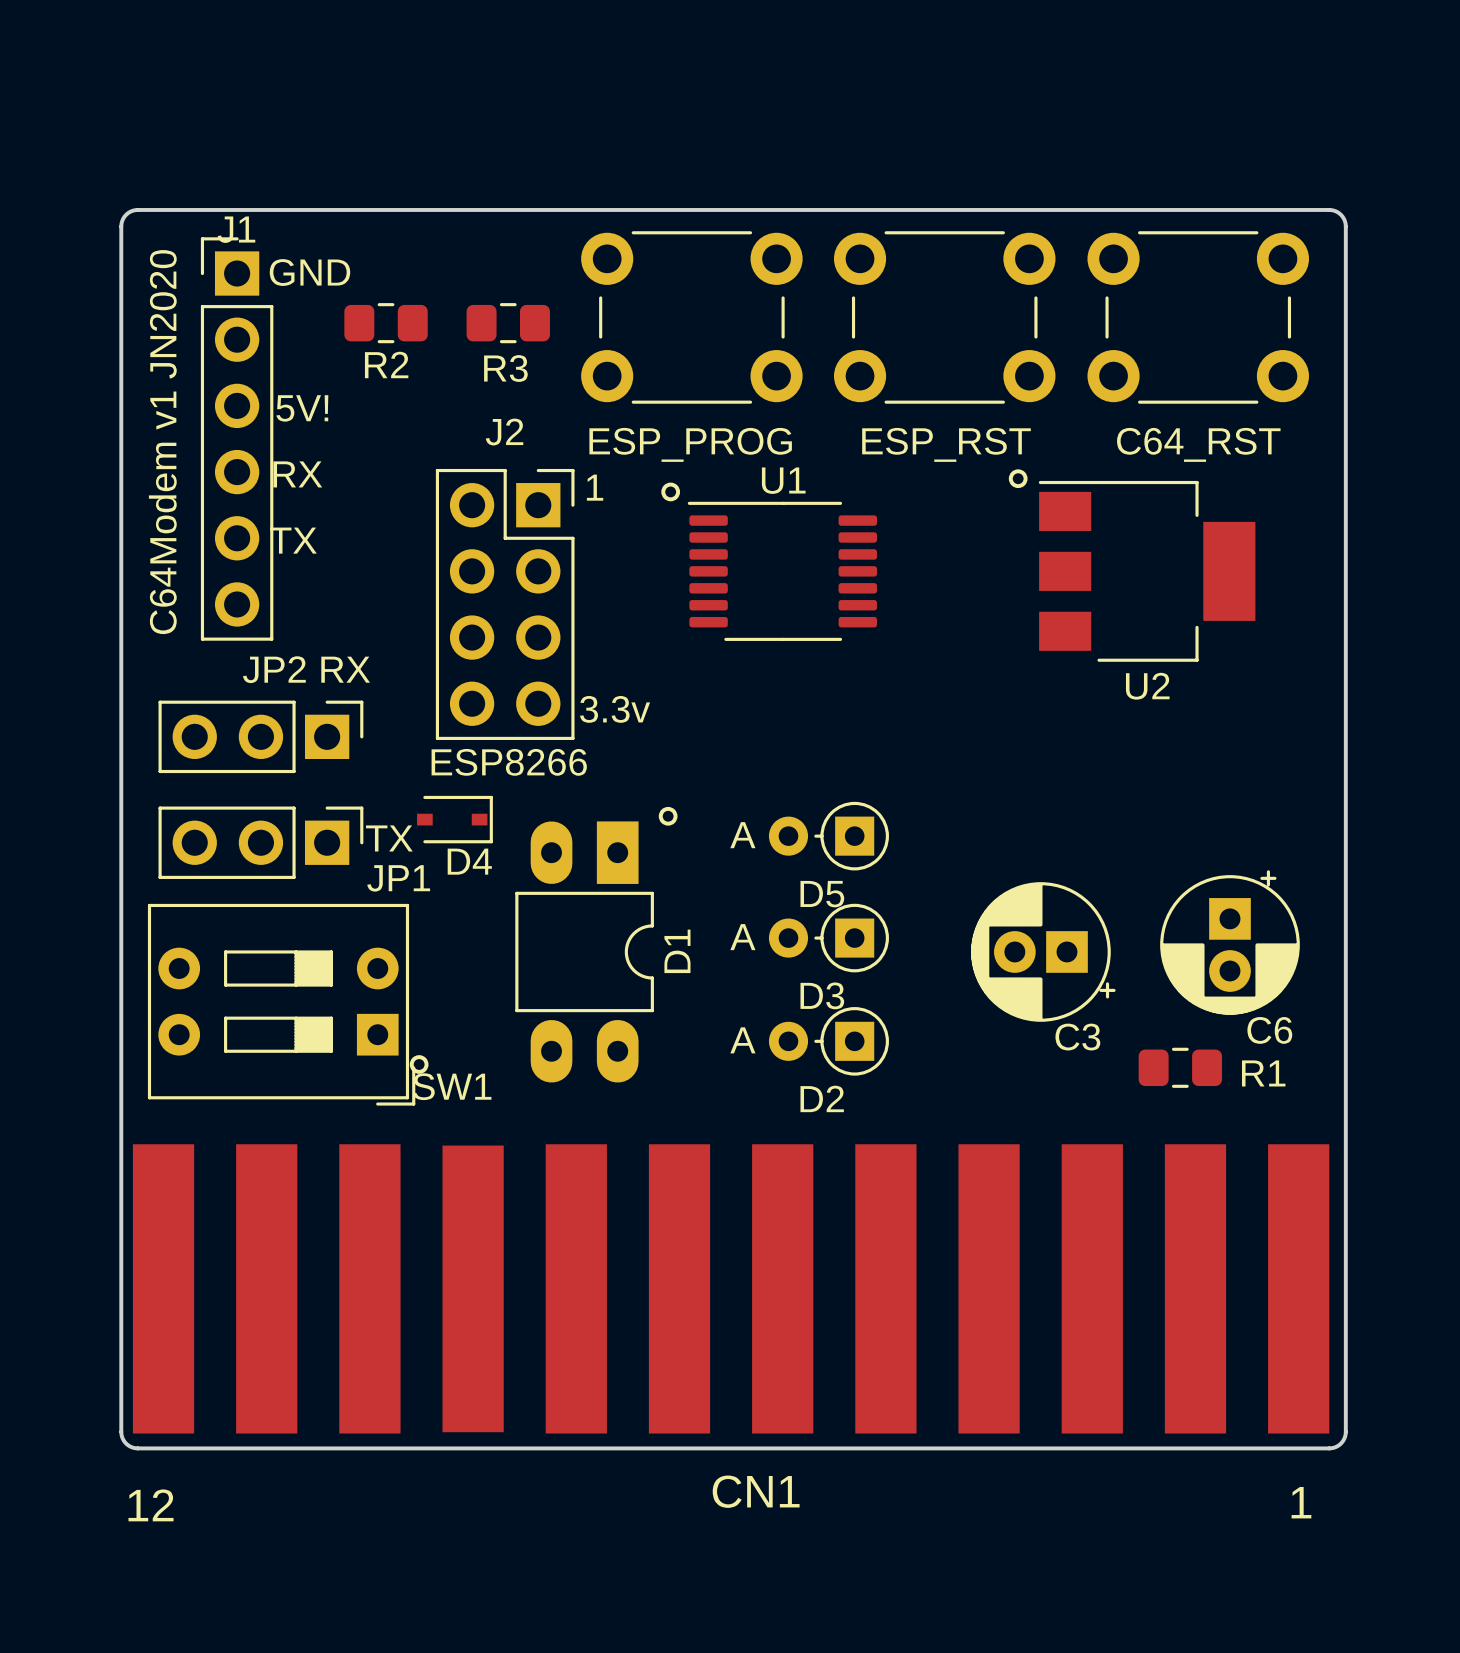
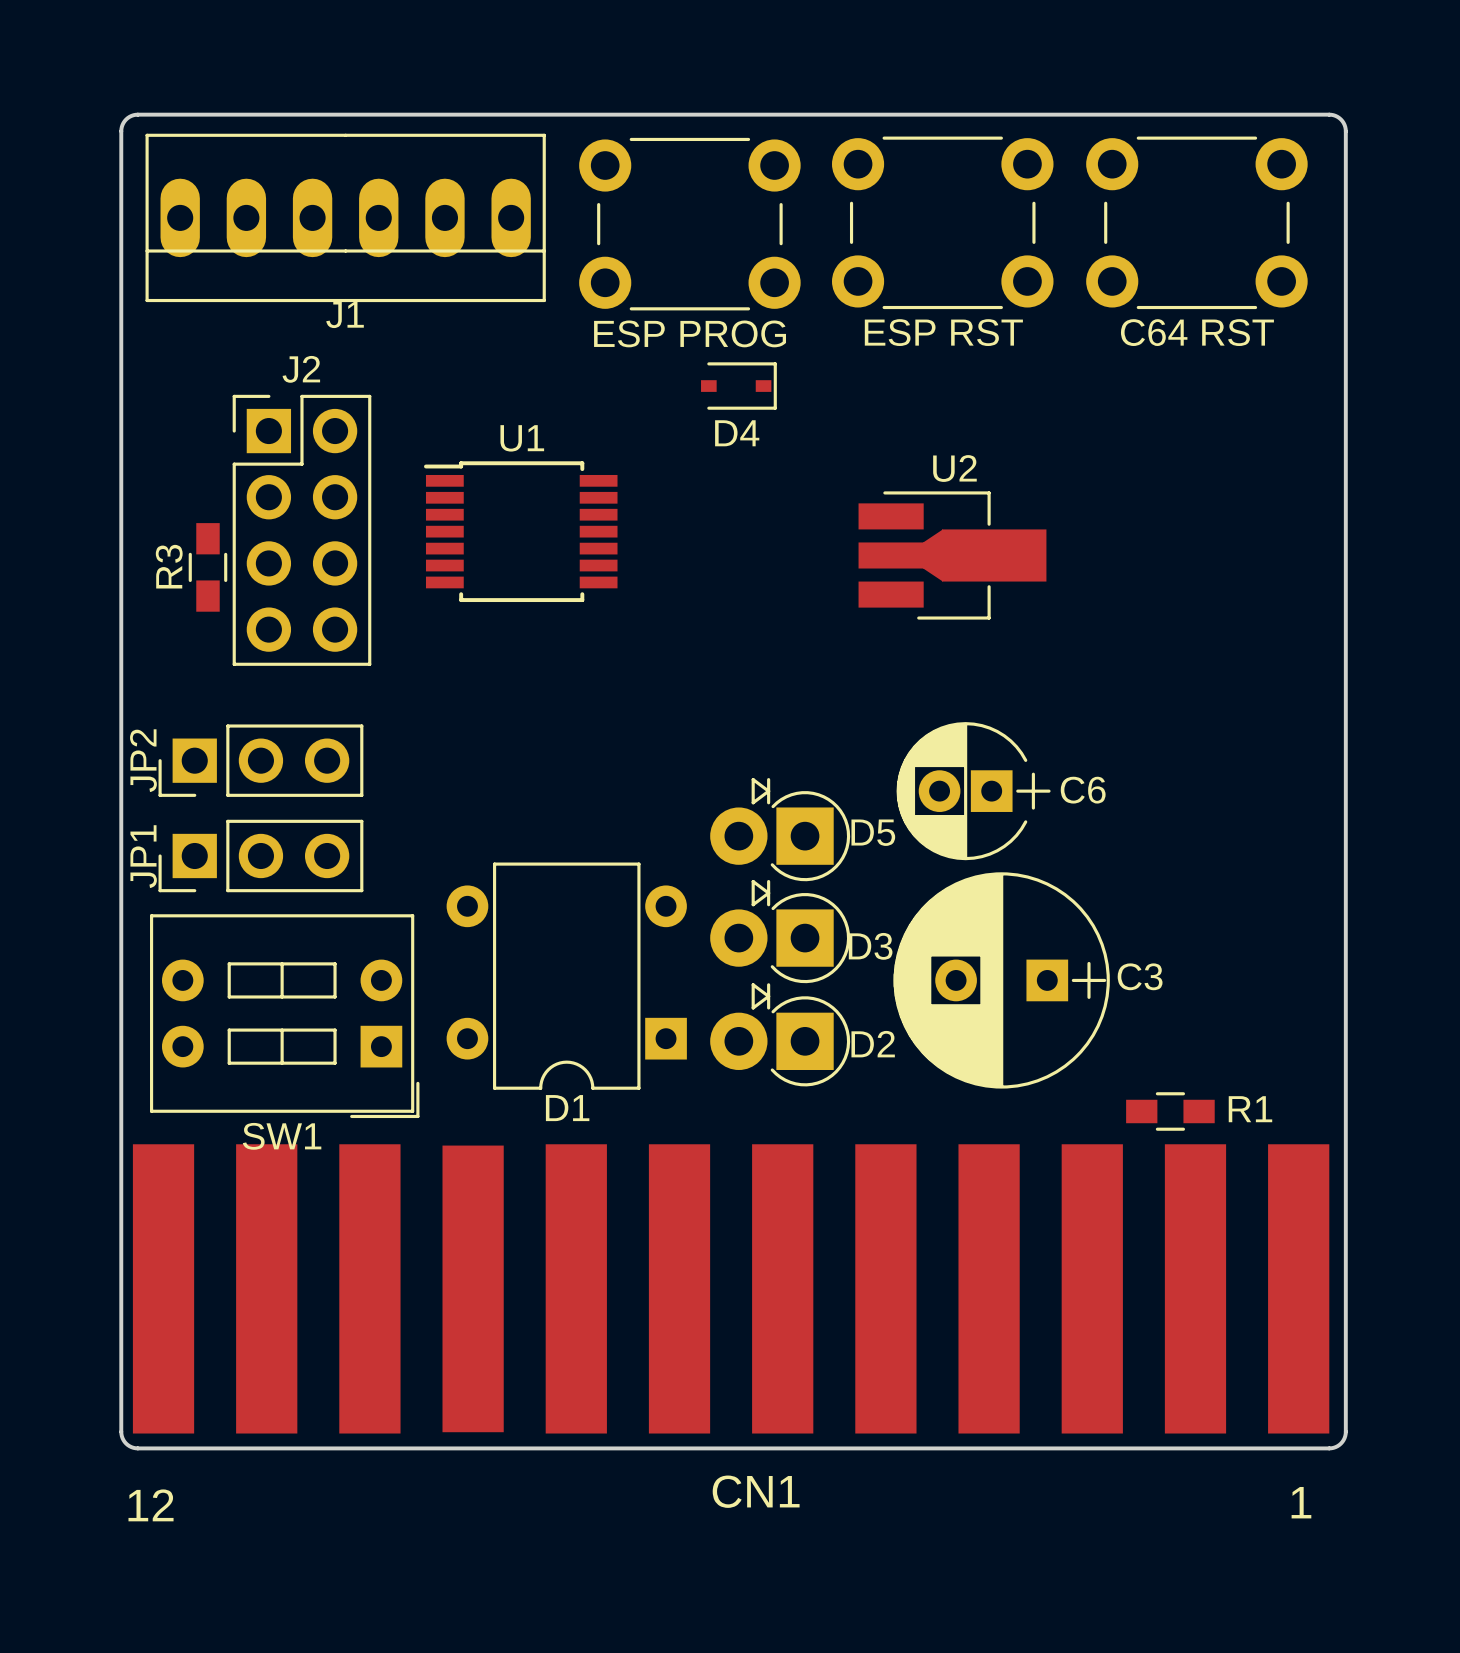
board edge: none -> (1345, 131) (1345, 226)
ESP RST: none -> (942, 222)
C64 RST: none -> (1196, 222)
ESP PROG: none -> (689, 224)
board edge: (121, 226) (126, 214) (137, 209) (1329, 209) (1340, 214) (1345, 226) -> (121, 226) (121, 129) (126, 119) (135, 114) (1329, 114) (1340, 119) (1345, 131)
J1 name position: J1 (236, 229) -> J1 (345, 314)
J1 footprint: [200, 237, 274, 641] -> [145, 133, 546, 303]
text: GND (309, 272) -> none
R3 footprint: [466, 303, 550, 344] -> [188, 523, 228, 612]
ESP_PROG: (691, 317) -> none
ESP_RST: (944, 317) -> none
C64_RST: (1198, 317) -> none
R2: (386, 323) -> none
R3 name position: R3 (505, 368) -> R3 (169, 566)
text: 5V! (302, 408) -> none
text: C64Modem v1 JN2020 (162, 442) -> none
J2 footprint: [435, 468, 575, 740] -> [232, 394, 372, 666]
drawing: [1008, 469, 1028, 489] -> none
text: RX (297, 474) -> none
U2 footprint: [1038, 480, 1256, 662] -> [858, 491, 1047, 620]
drawing: [661, 482, 681, 502] -> none
text: 1 (595, 487) -> none
U1 footprint: [687, 501, 878, 641] -> [424, 461, 618, 603]
text: TX (293, 540) -> none
U2 name position: U2 (1147, 686) -> U2 (954, 468)
text: 3.3v (615, 709) -> none
JP2 RX: (260, 736) -> none
JP2: none -> (260, 760)
text: ESP8266 (509, 762) -> none
D5 footprint: [768, 801, 889, 871] -> [710, 778, 851, 882]
drawing: [658, 806, 678, 826] -> none
D4 position: (454, 819) -> (738, 386)
D1 footprint: [515, 821, 654, 1083] -> [446, 862, 687, 1090]
text: TX (389, 838) -> none
JP1 rotation: 0° (260, 842) -> 180° (260, 855)
D4 name position: D4 (469, 861) -> D4 (737, 433)
C6 footprint: [1160, 870, 1300, 1015] -> [896, 722, 1051, 861]
C3 footprint: [971, 882, 1116, 1022] -> [893, 872, 1110, 1089]
D5 name position: D5 (822, 894) -> D5 (873, 832)
SW1 footprint: [147, 903, 416, 1106] -> [150, 914, 420, 1119]
D3 footprint: [768, 903, 889, 973] -> [710, 879, 851, 984]
D1 name position: D1 (677, 951) -> D1 (567, 1108)
D3 name position: D3 (822, 995) -> D3 (870, 946)
D2 footprint: [768, 1007, 889, 1076] -> [710, 983, 851, 1087]
C6 name position: C6 (1269, 1030) -> C6 (1083, 790)
C3 name position: C3 (1077, 1037) -> C3 (1140, 976)
R1 footprint: [1138, 1047, 1223, 1088] -> [1126, 1092, 1215, 1131]
drawing: [409, 1055, 429, 1074] -> none
SW1 name position: SW1 (452, 1086) -> SW1 (282, 1136)
D2 name position: D2 (822, 1098) -> D2 (873, 1044)

